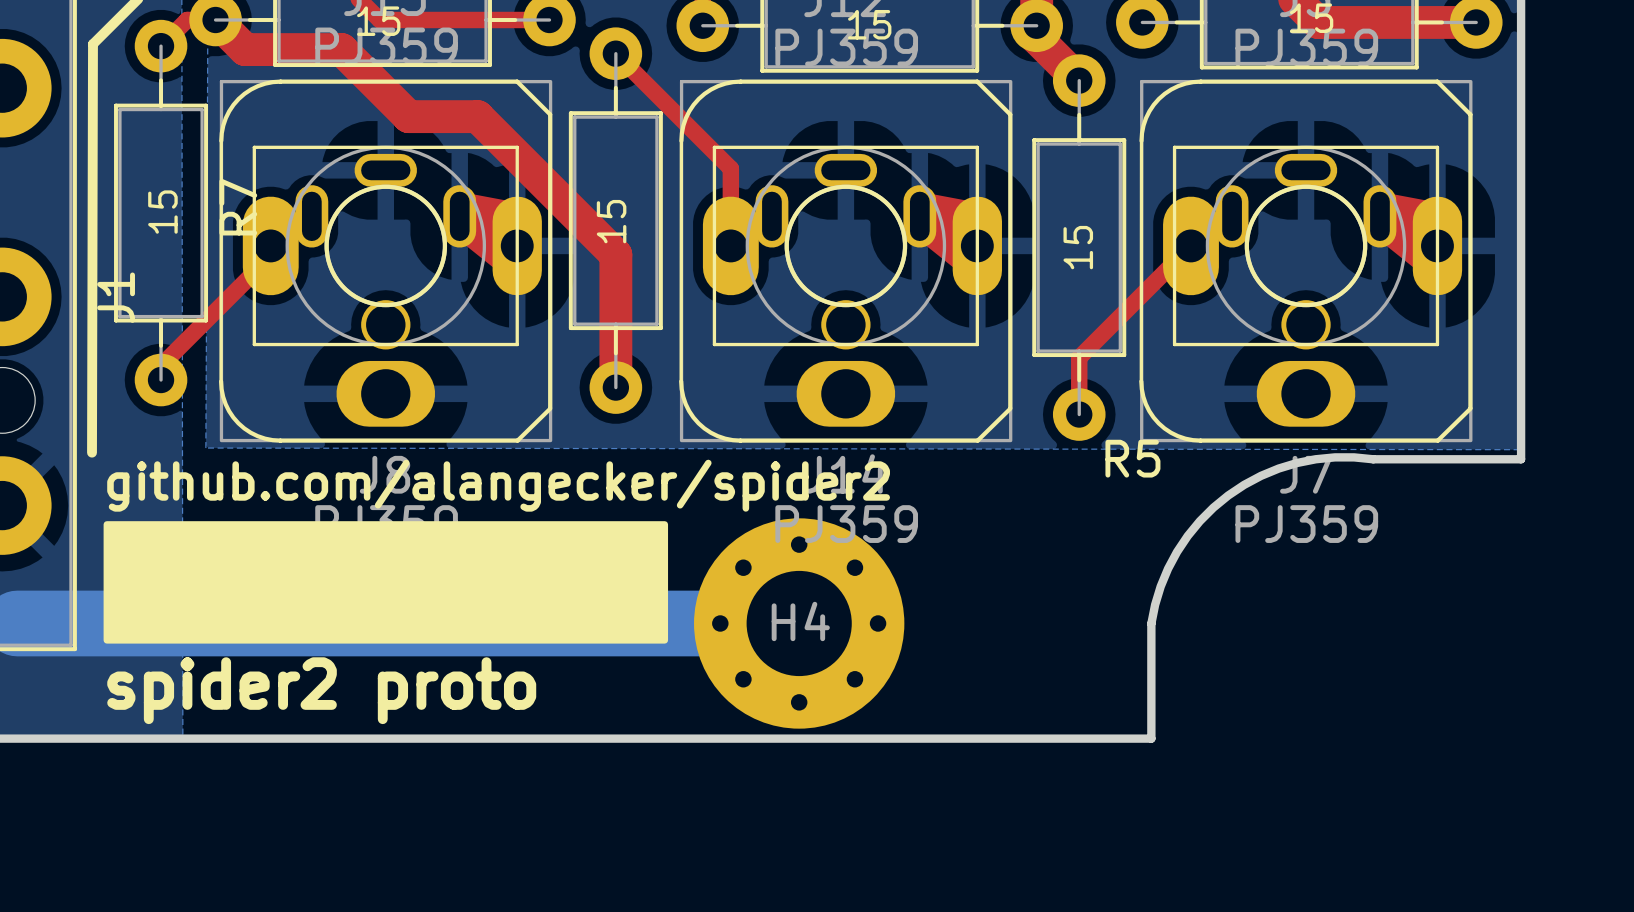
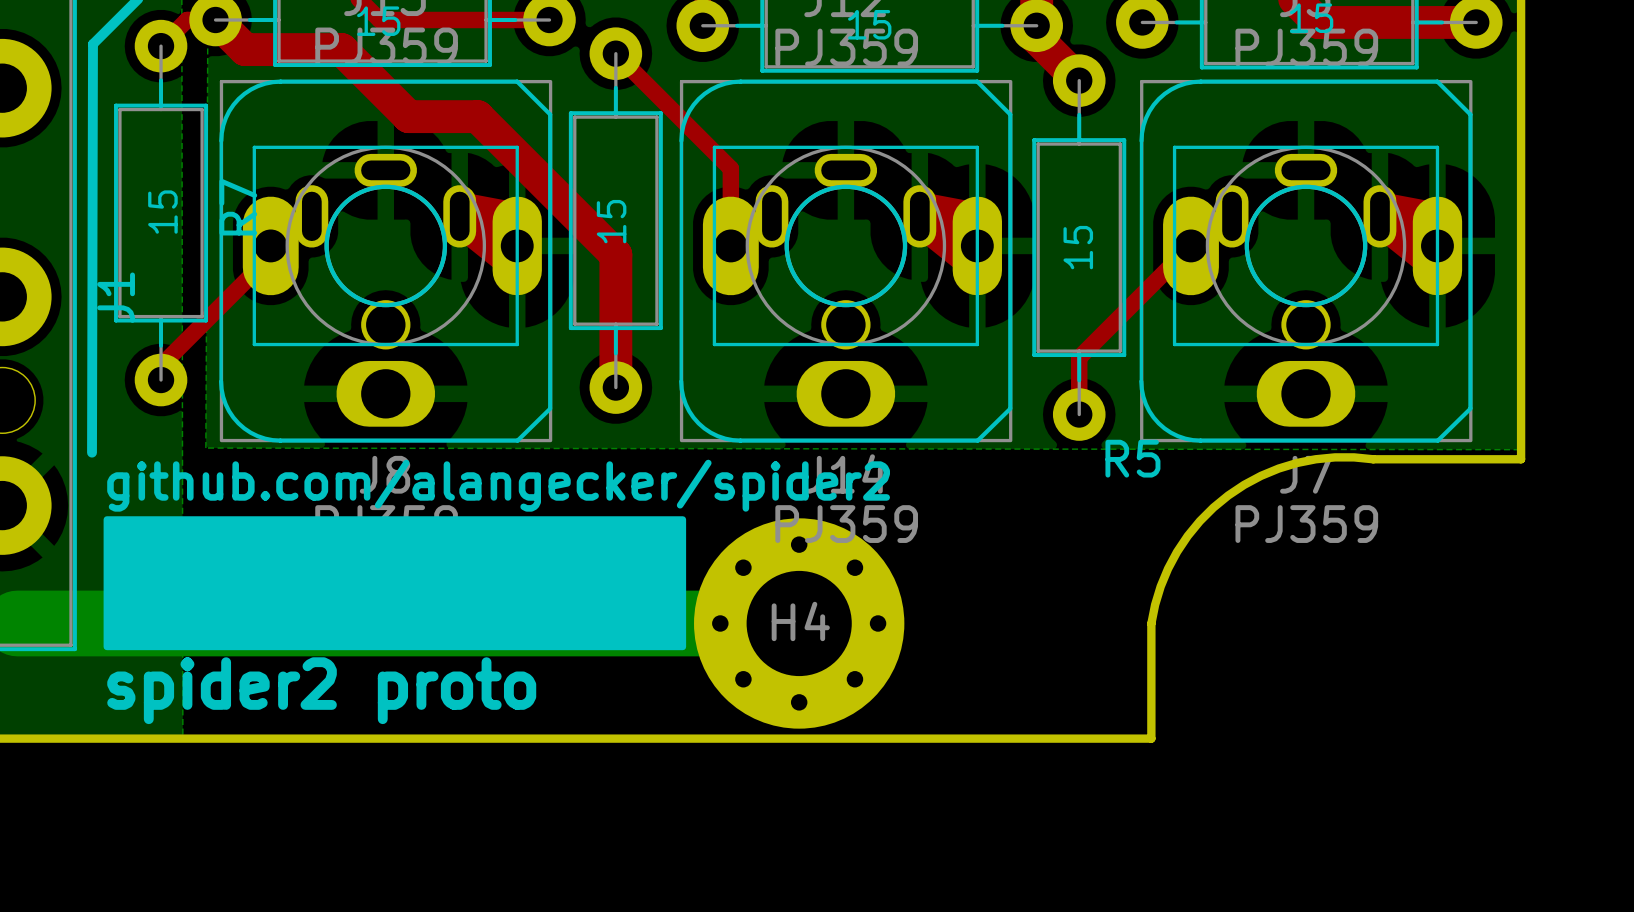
drawing shape: [103, 521, 669, 644] -> [103, 516, 687, 651]

